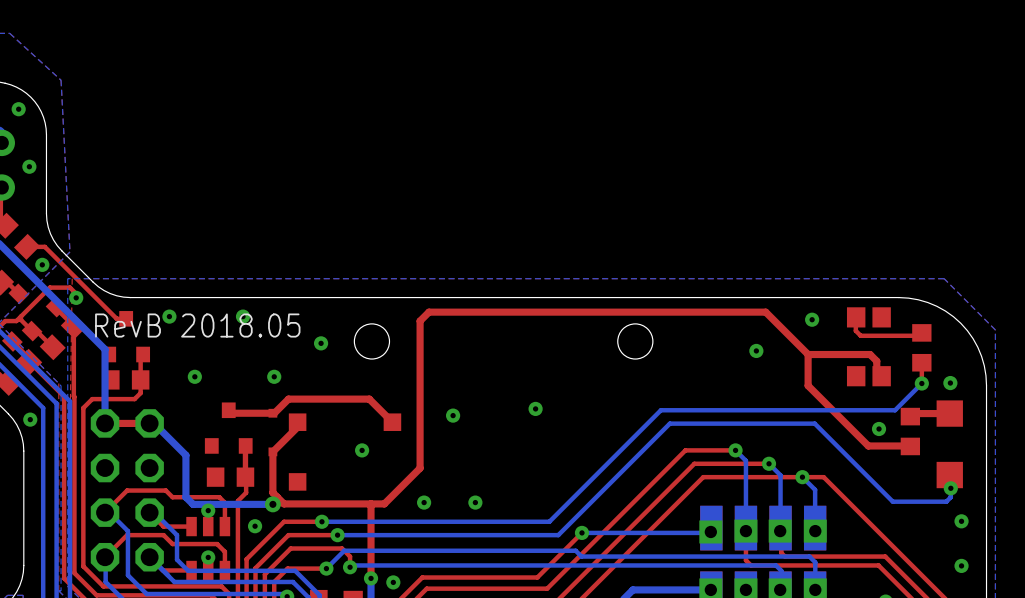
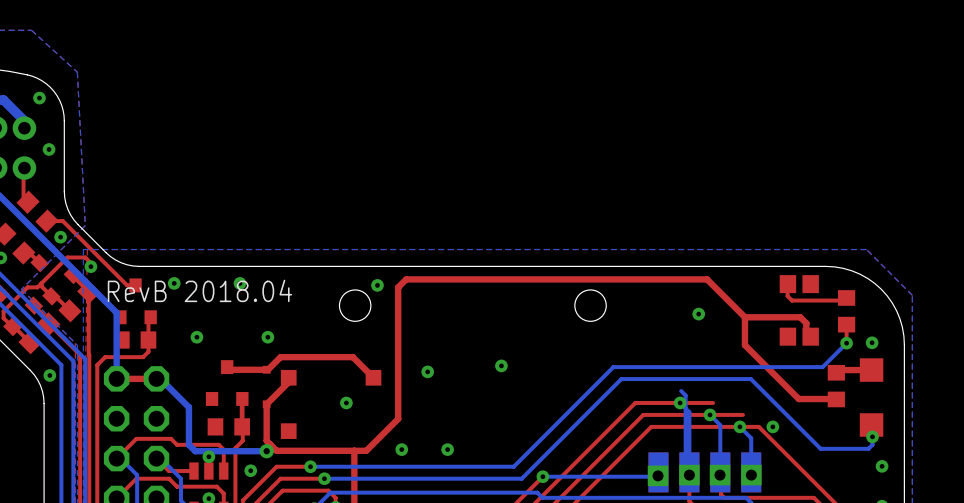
via: (812, 319) -> none
text: RevB 2018.05 (197, 325) -> RevB 2018.04 (199, 290)
via position: (321, 343) -> (377, 285)
via position: (879, 428) -> (772, 426)
bottom track: none -> (681, 391) (685, 395) (685, 457)
top track: none -> (713, 402) (680, 402)
top track: none -> (742, 414) (710, 414)

